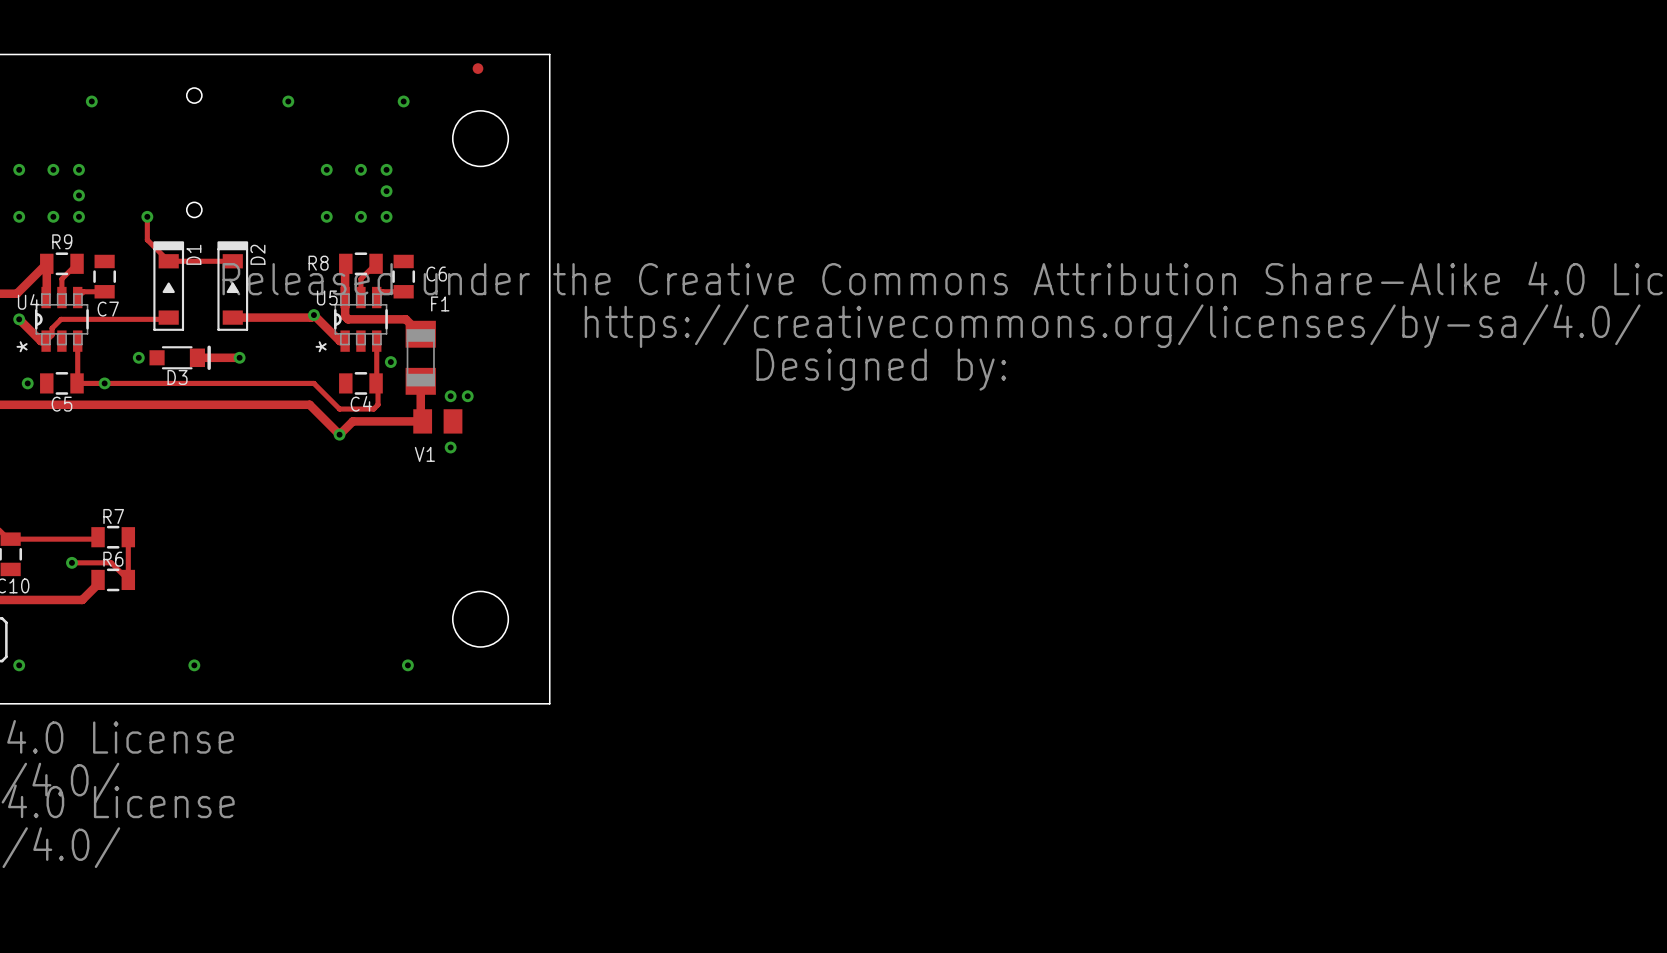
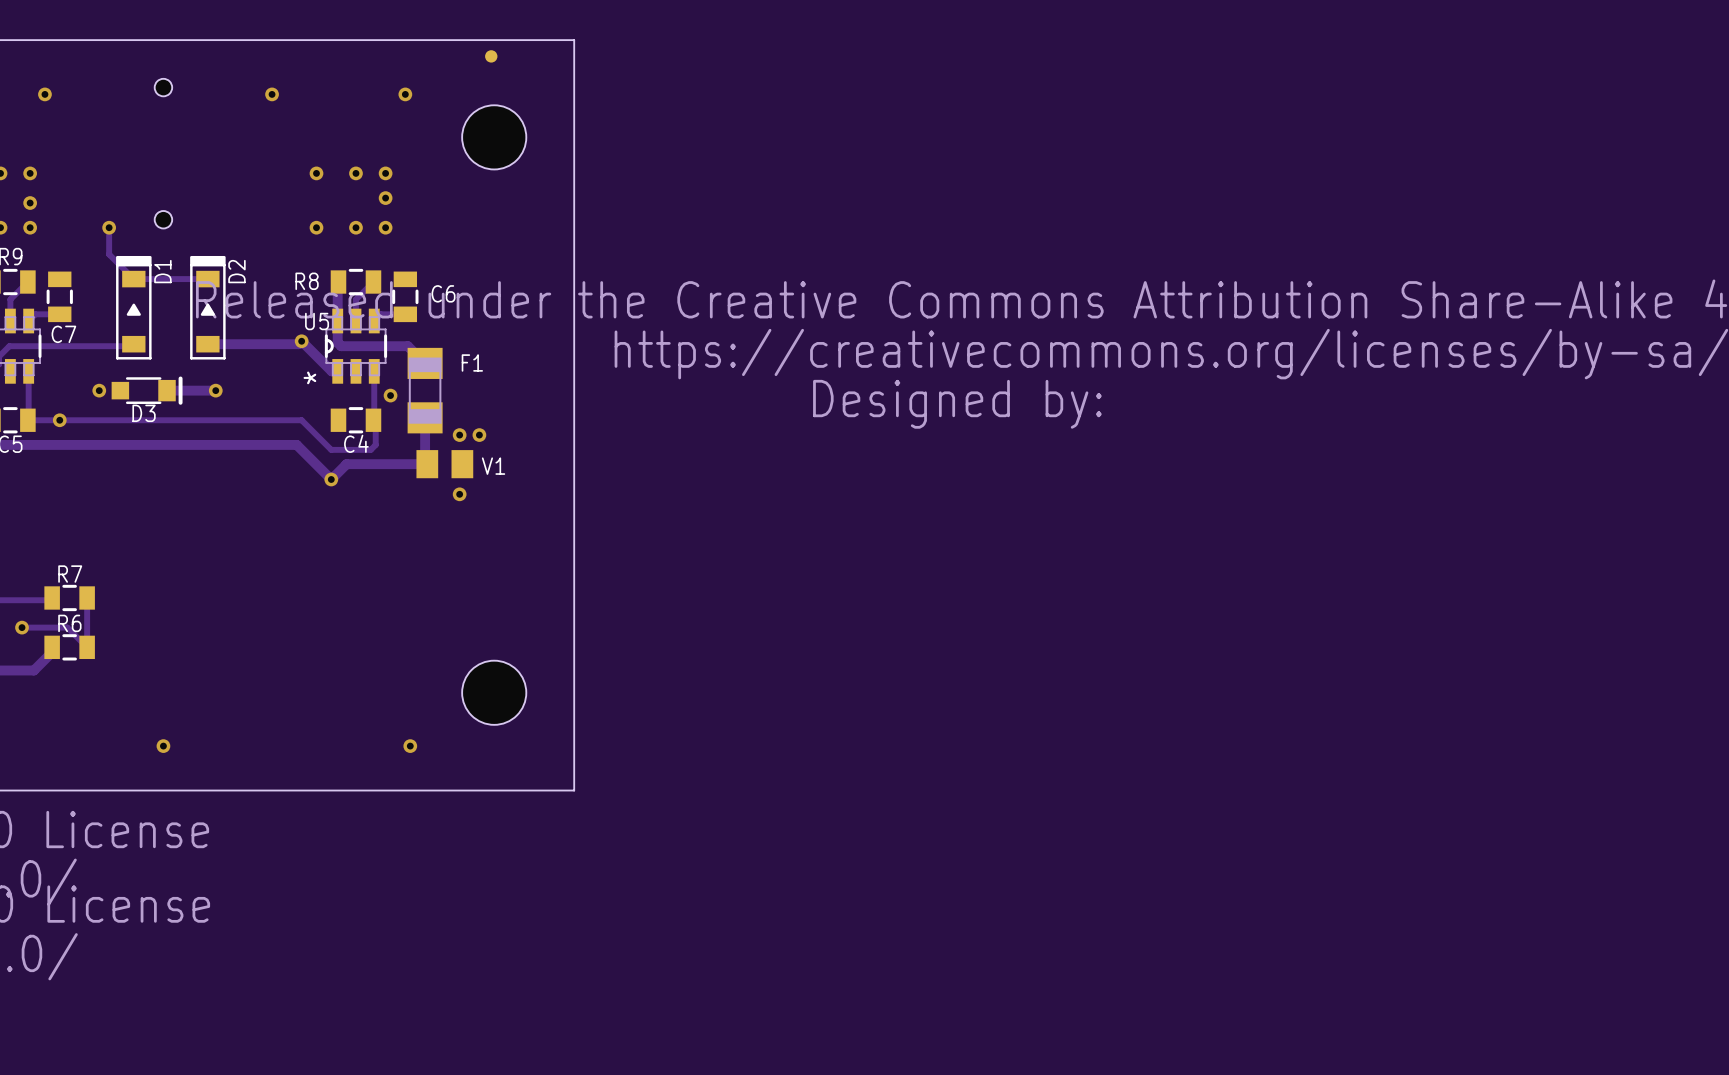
F1 name position: F1 (440, 303) -> F1 (472, 362)
V1 name position: V1 (424, 454) -> V1 (493, 466)

